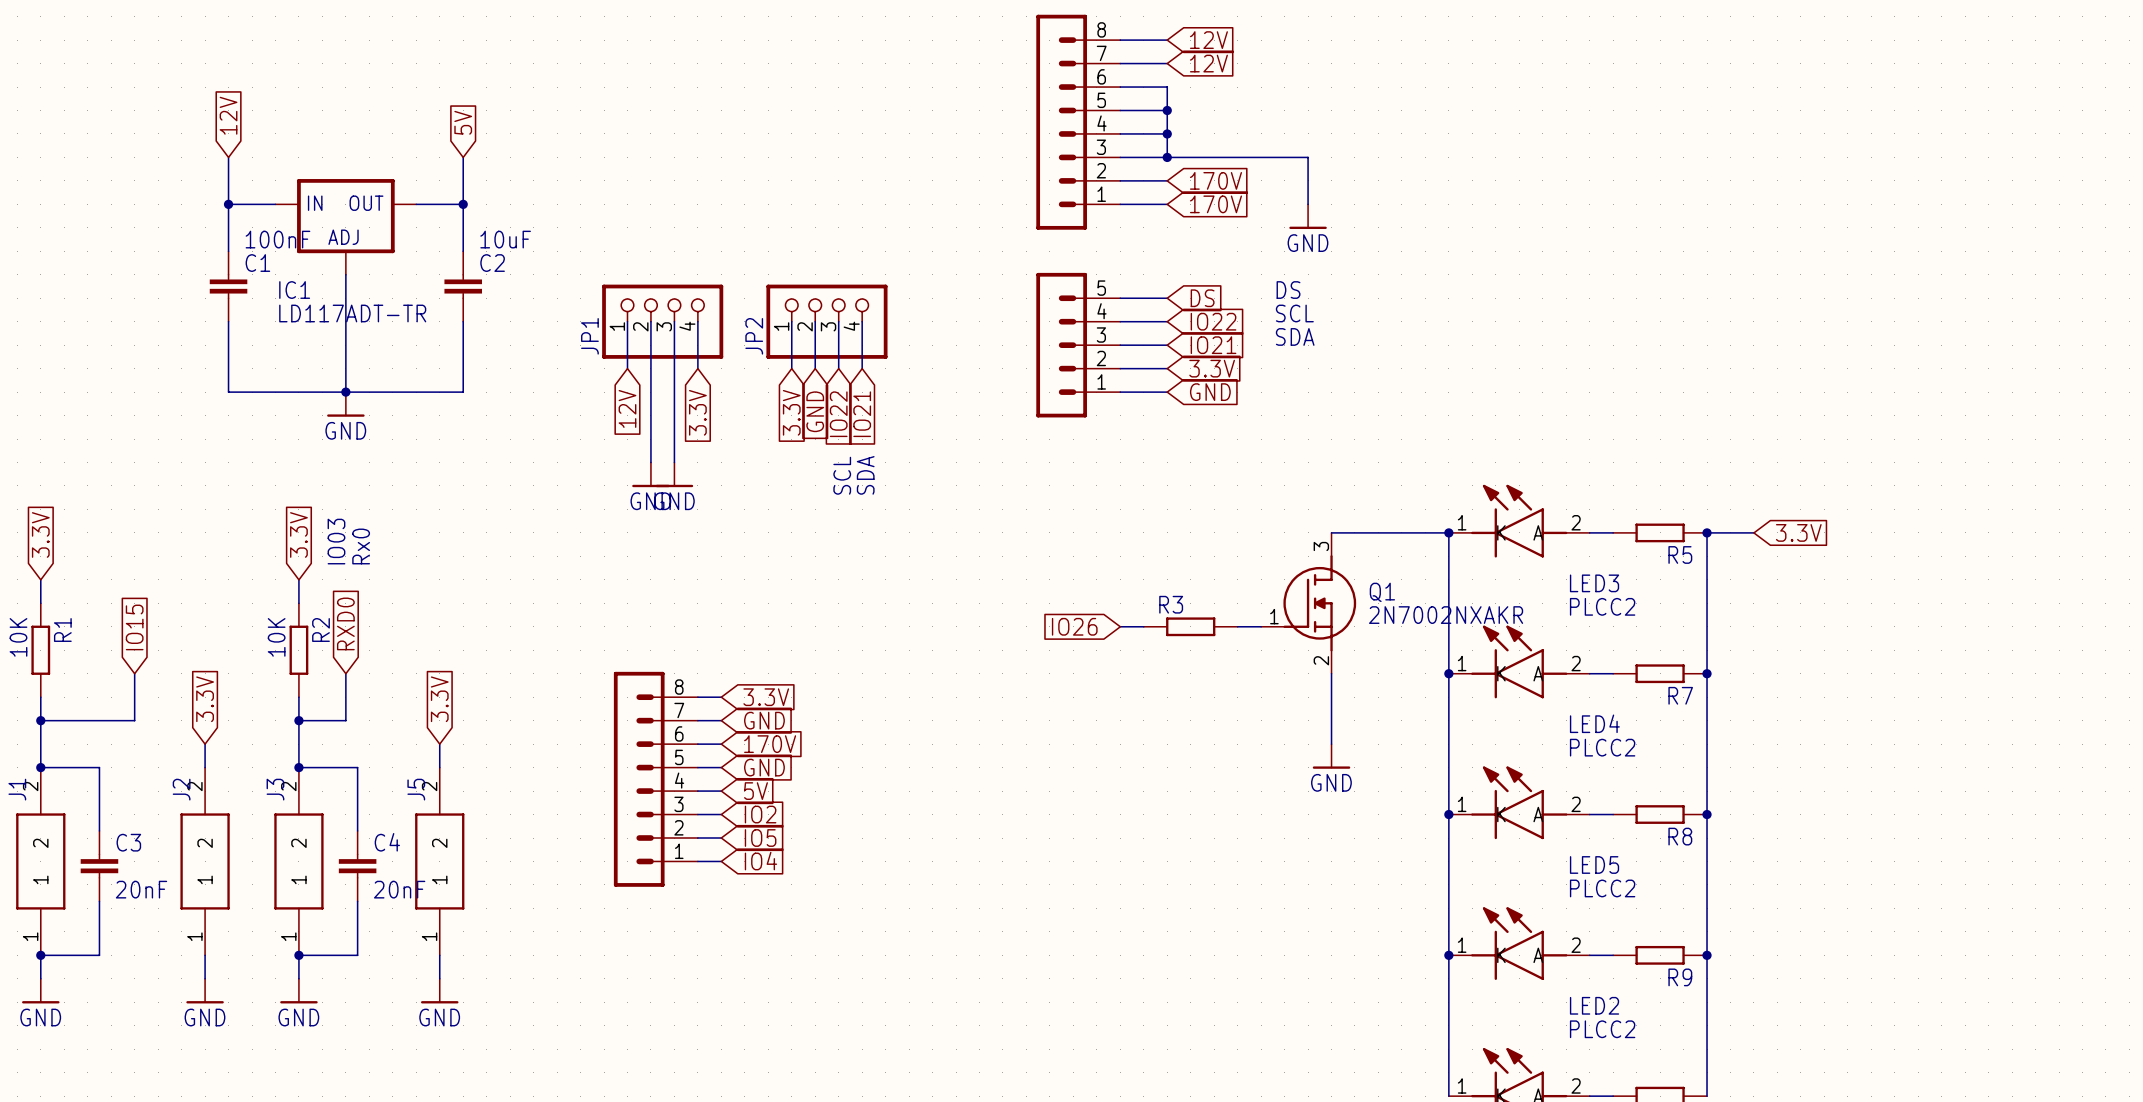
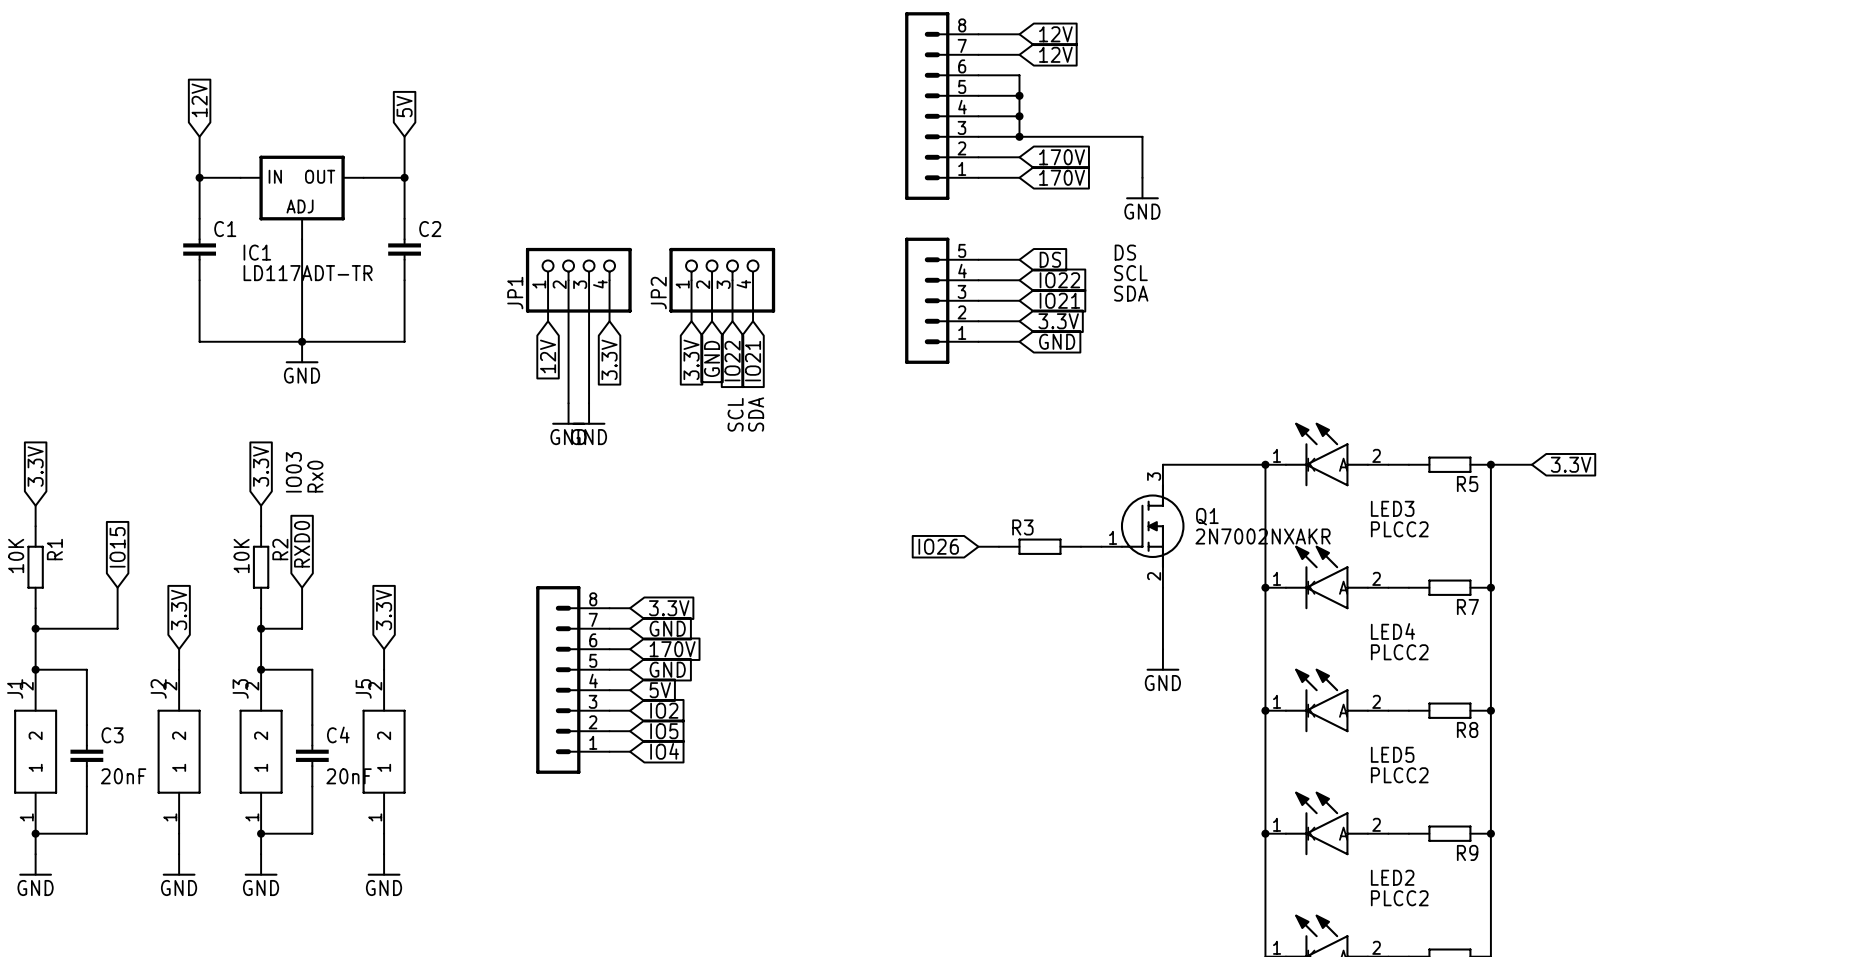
C1 value: 100nF (277, 239) -> none
C2 value: 10uF (505, 239) -> none

